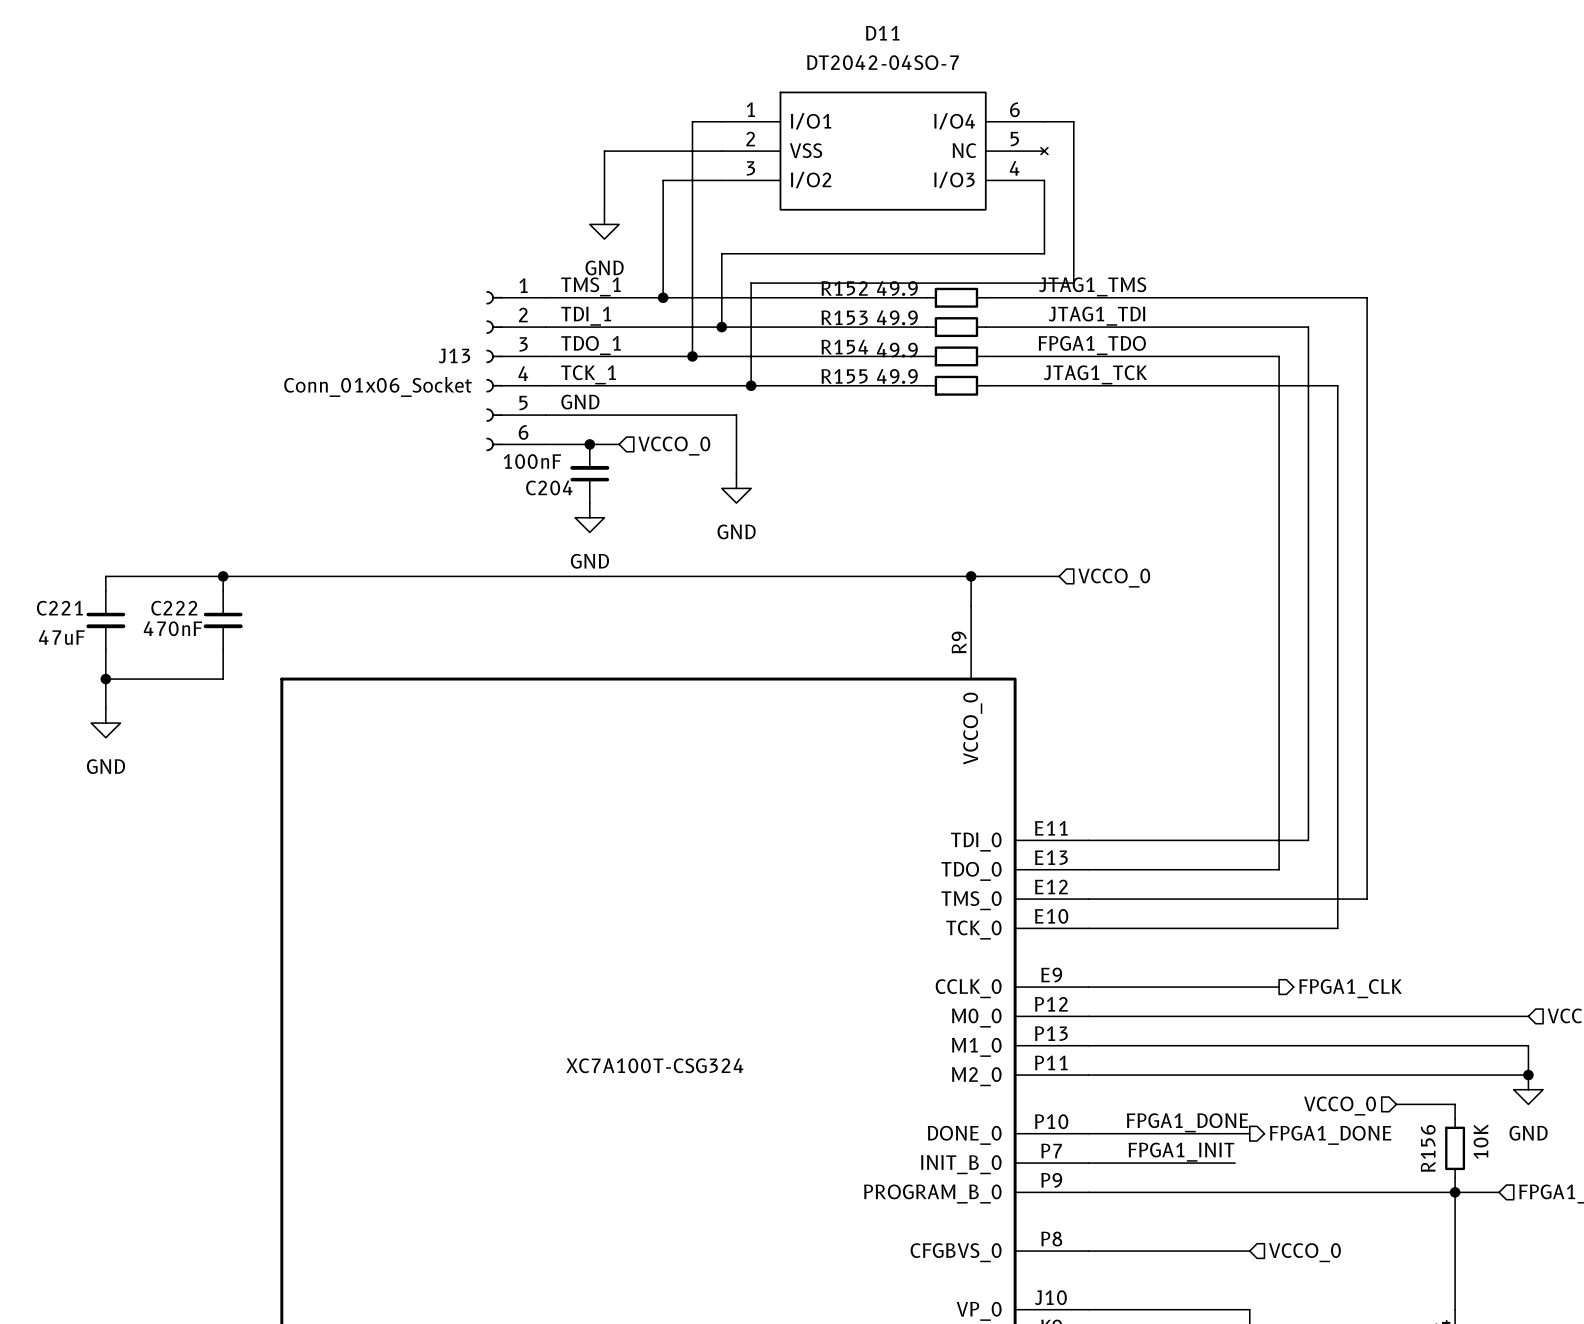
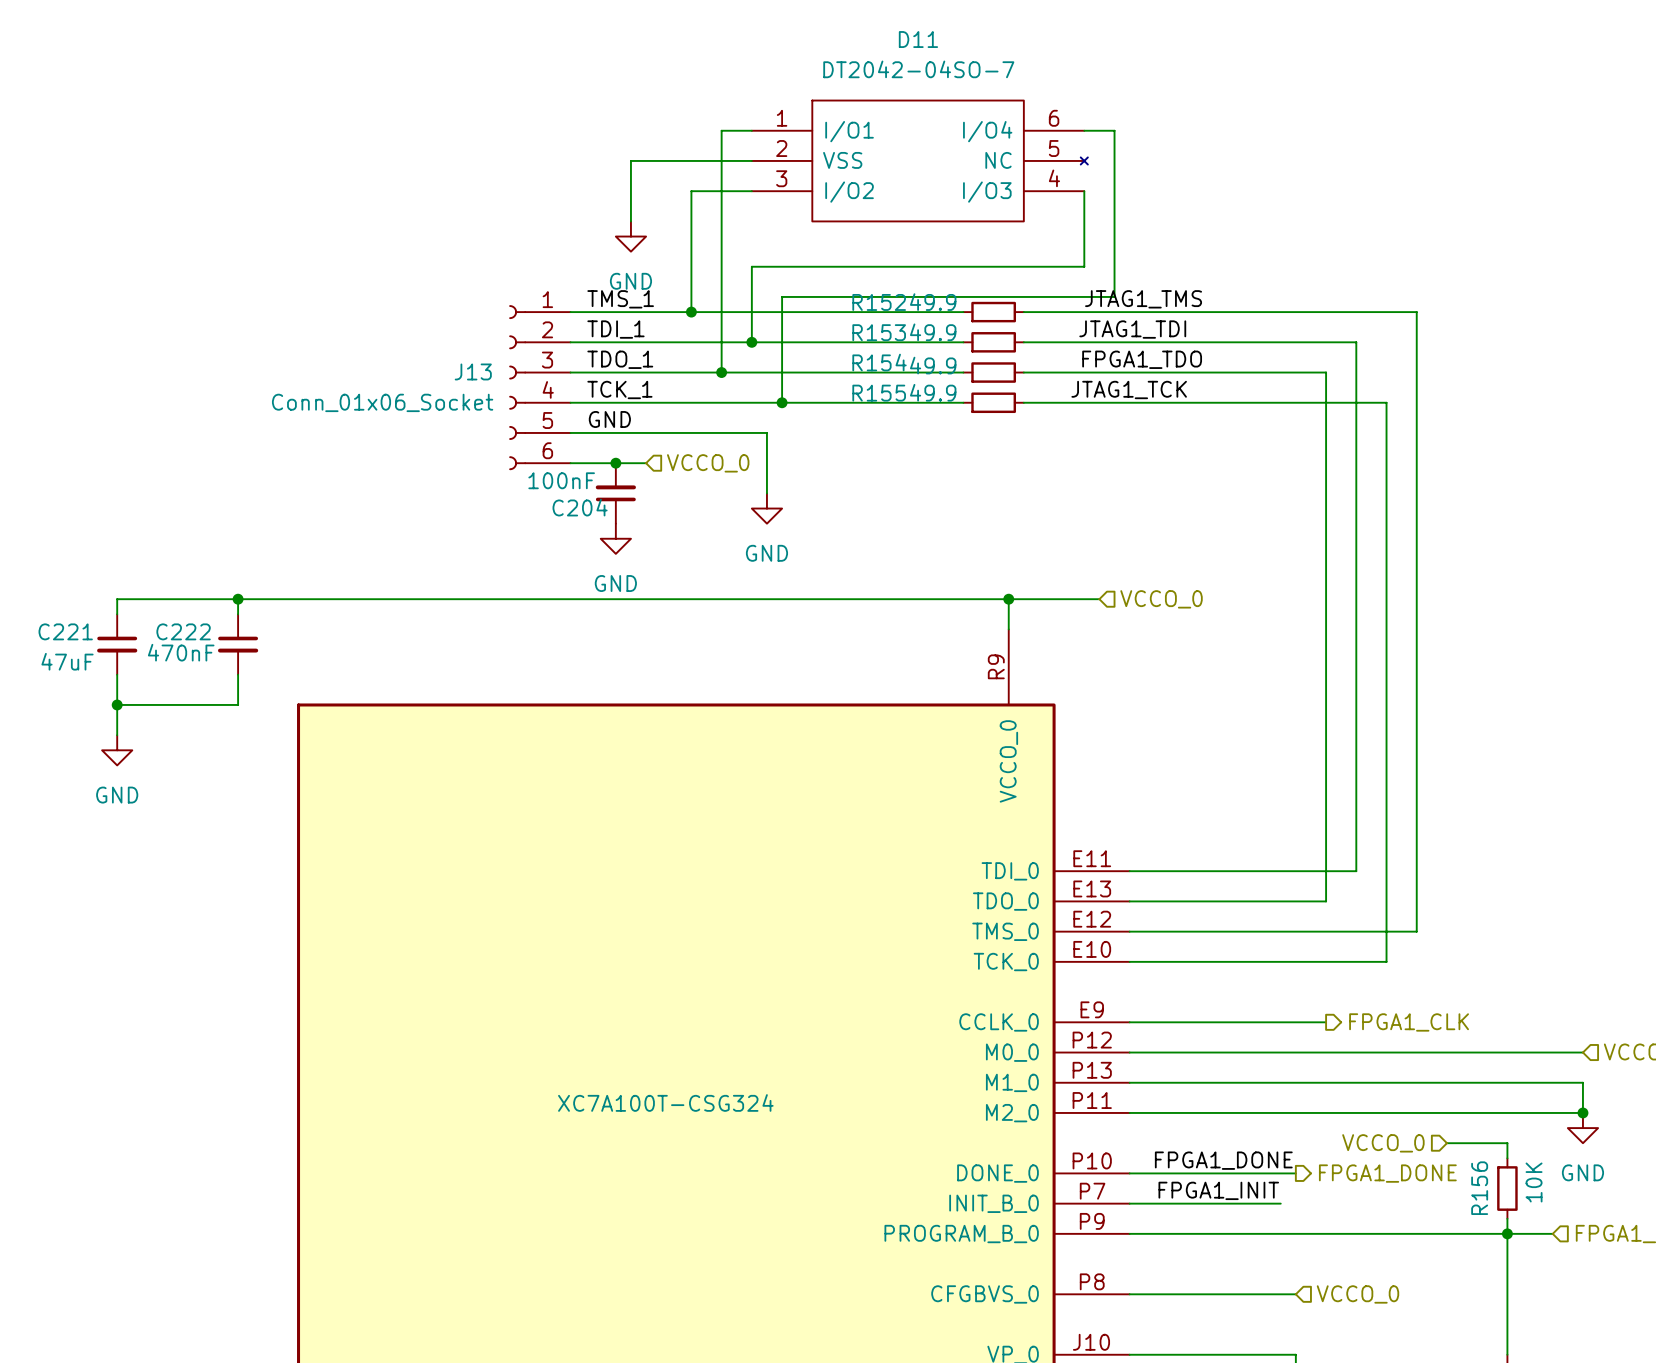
label position: JTAG1_TMS (1092, 286) -> JTAG1_TMS (1143, 299)
label position: FPGA1_TDO (1092, 345) -> FPGA1_TDO (1142, 359)

